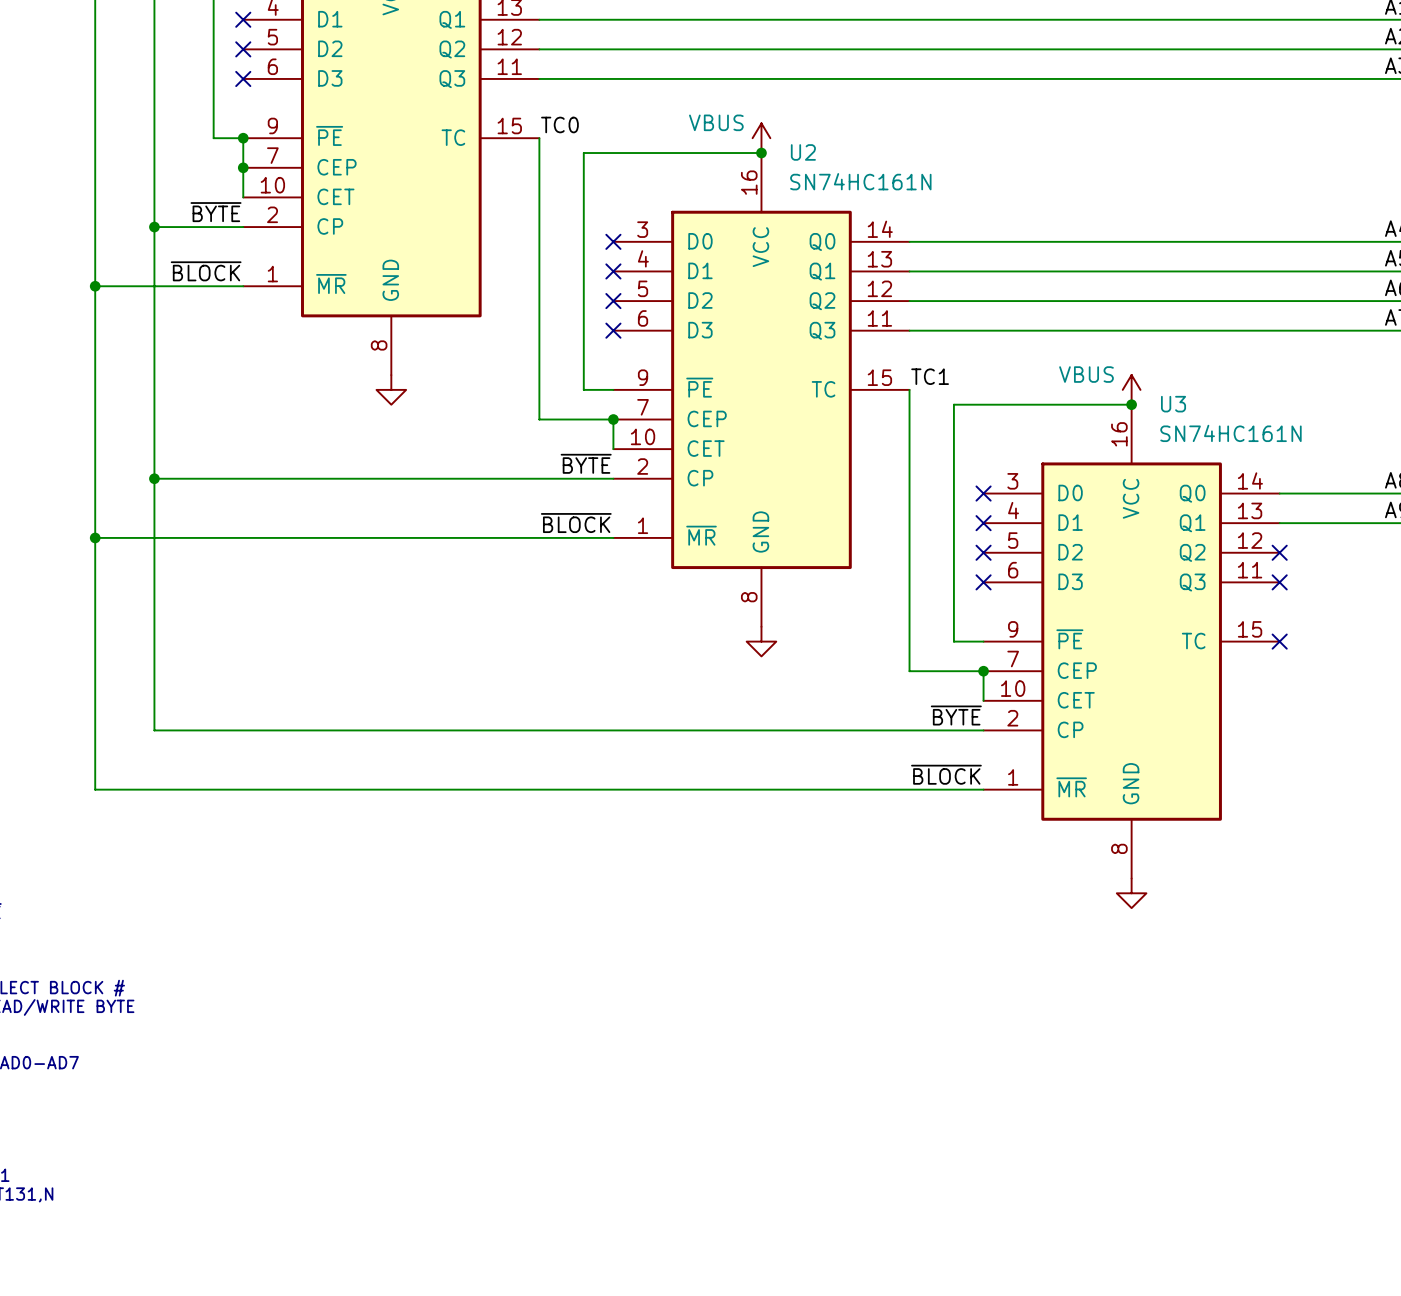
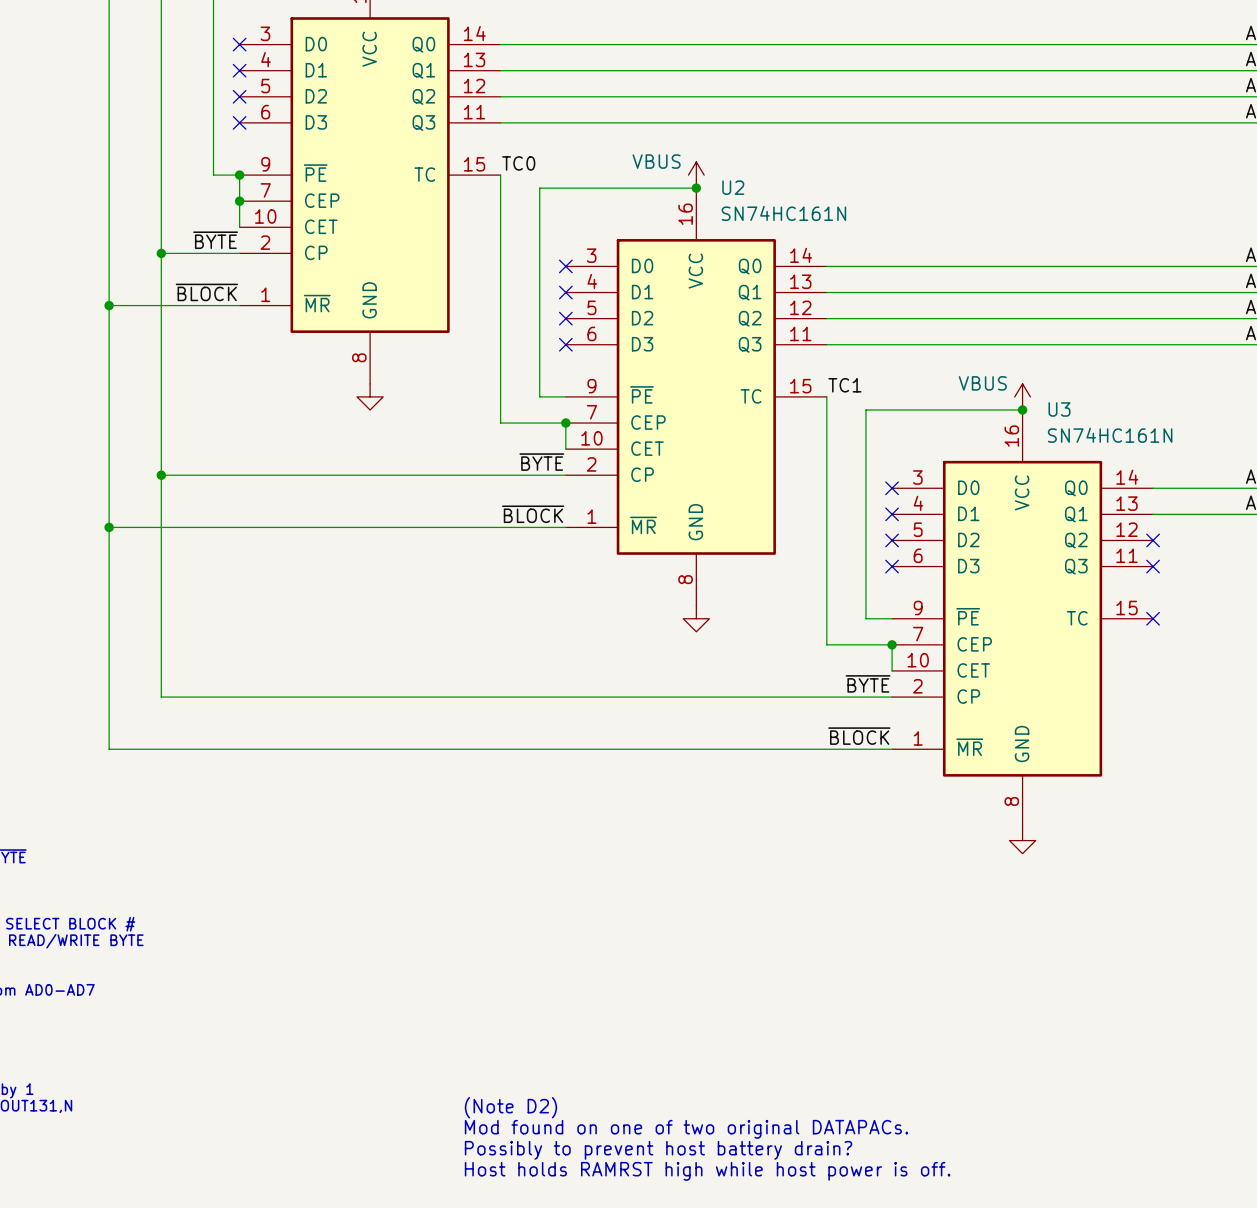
text: none -> (Note D2) (510, 1107)
text: none -> Mod found on one of two original DATAPACs. (686, 1129)
text: none -> Possibly to prevent host battery drain? (658, 1150)
text: none -> Host holds RAMRST high while host power is off. (707, 1171)

